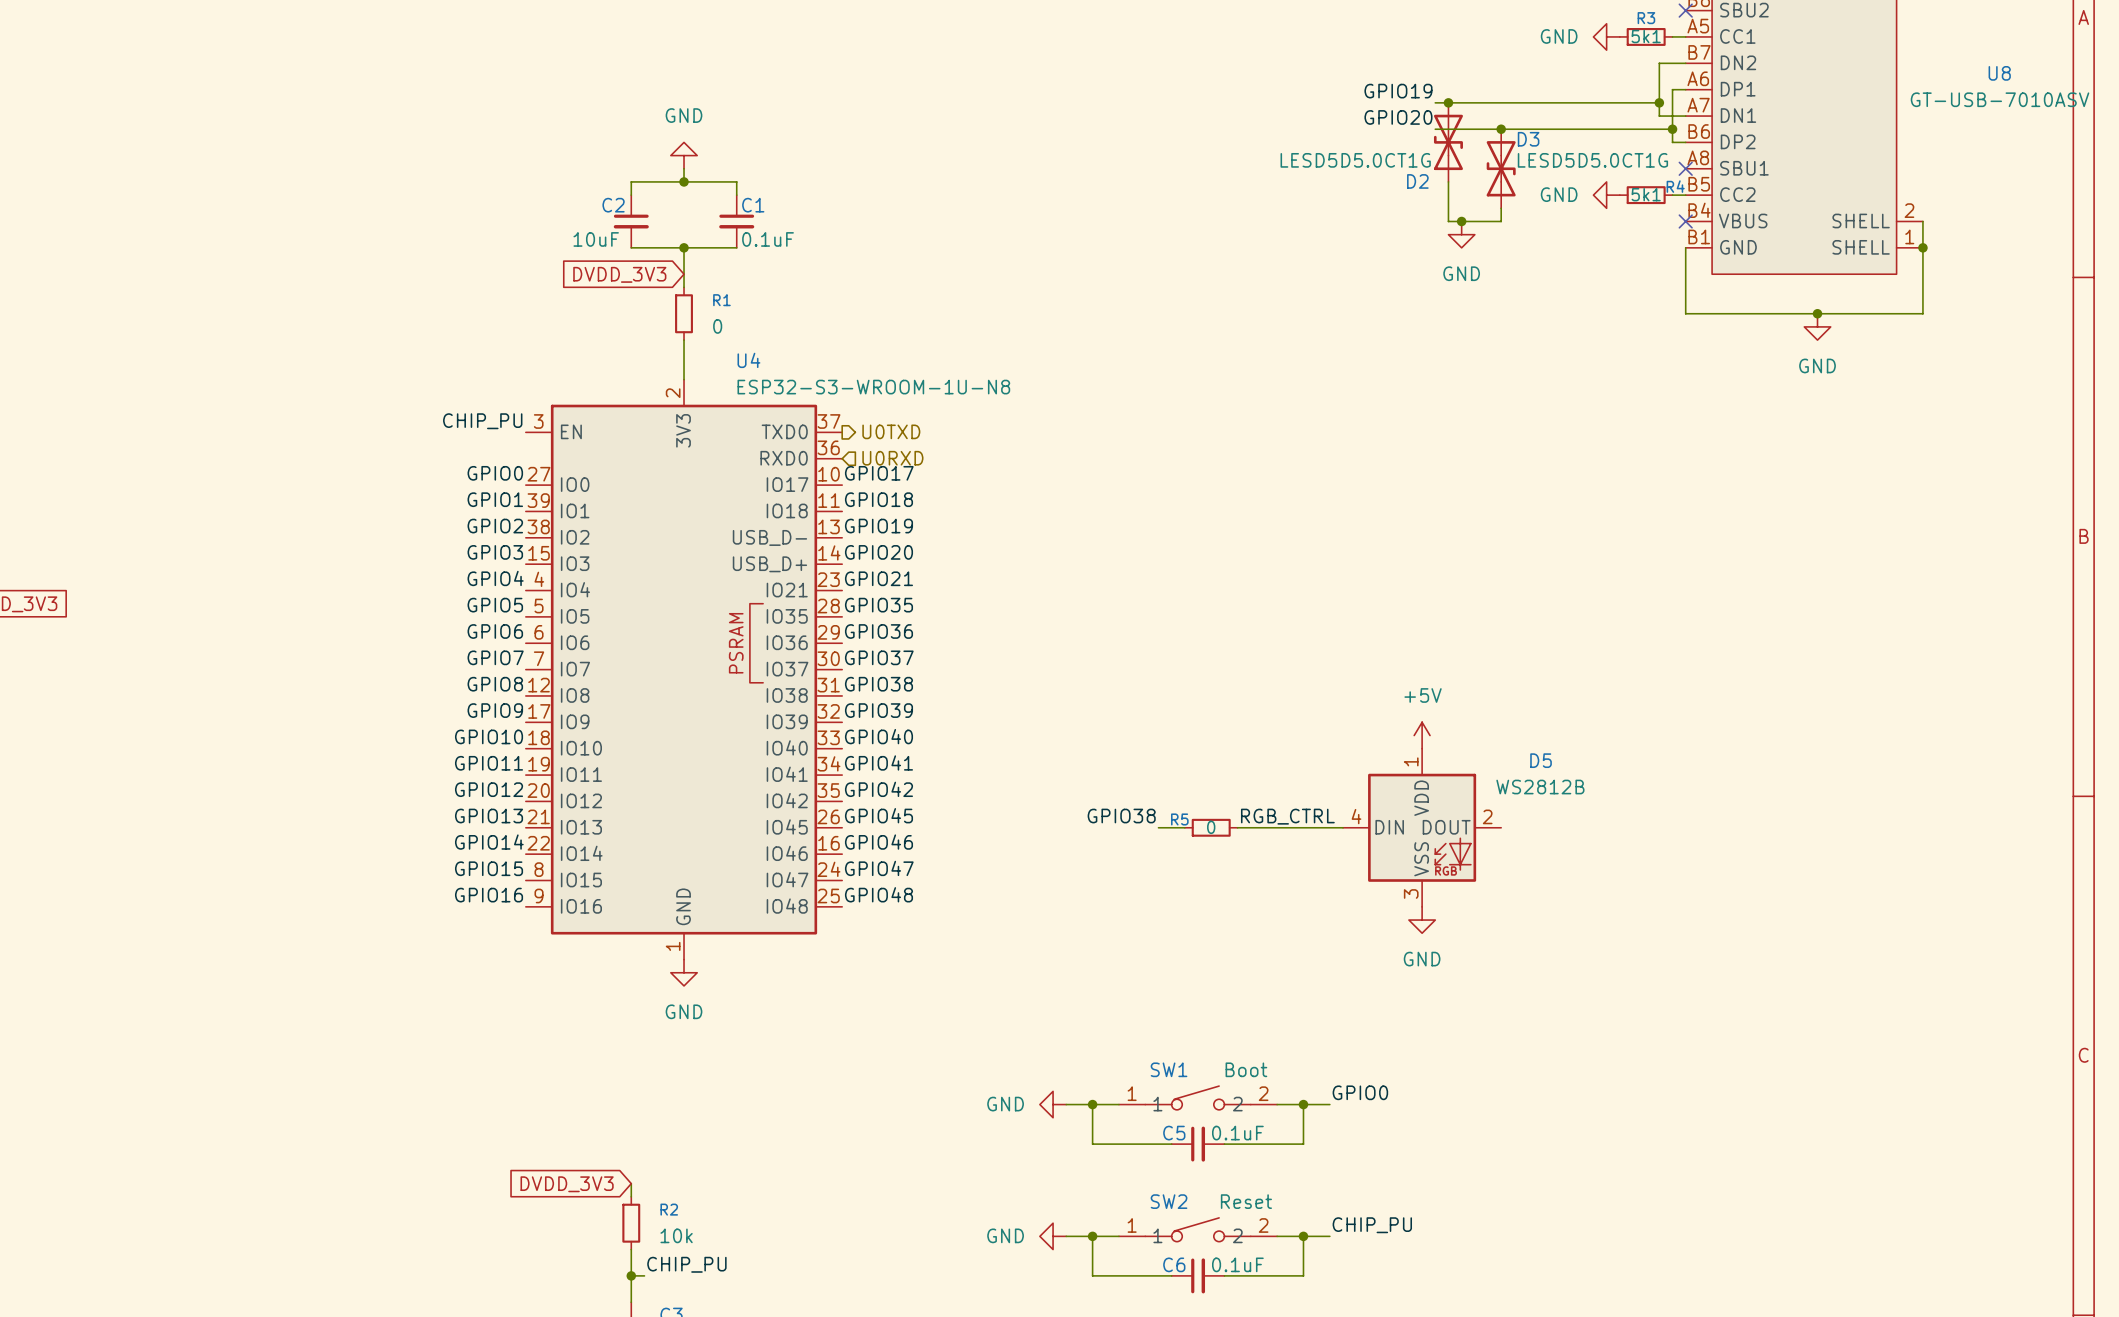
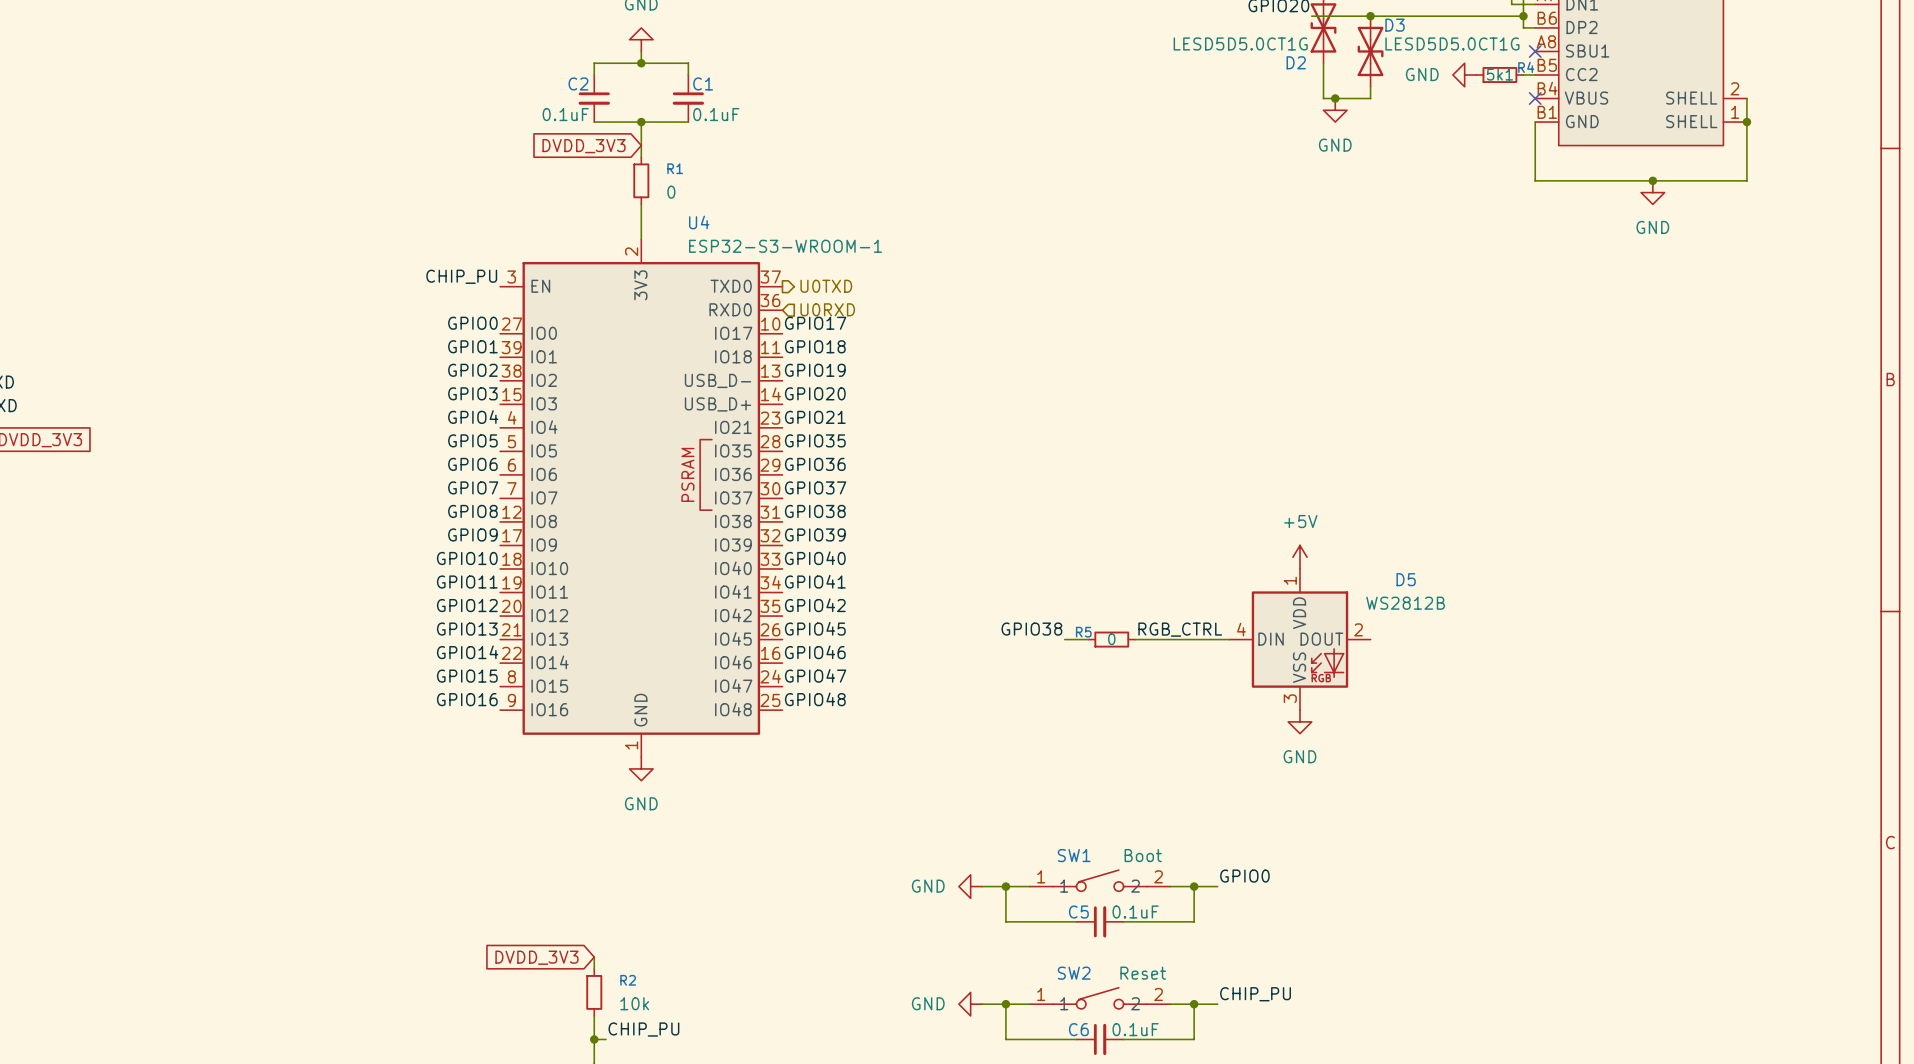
C2 value: 10uF (596, 239) -> 0.1uF (565, 114)
U4 value: ESP32-S3-WROOM-1U-N8 (873, 387) -> ESP32-S3-WROOM-1 (785, 246)

